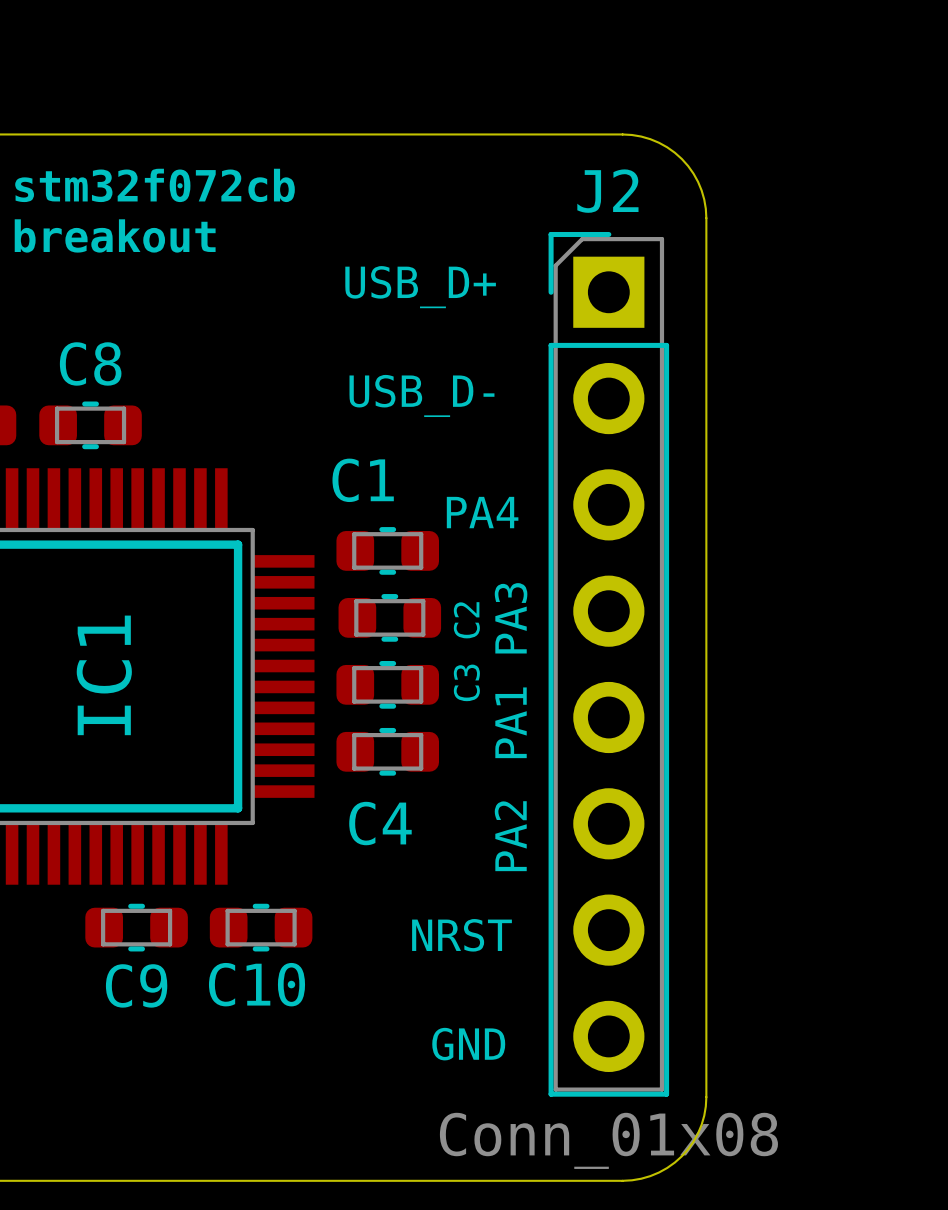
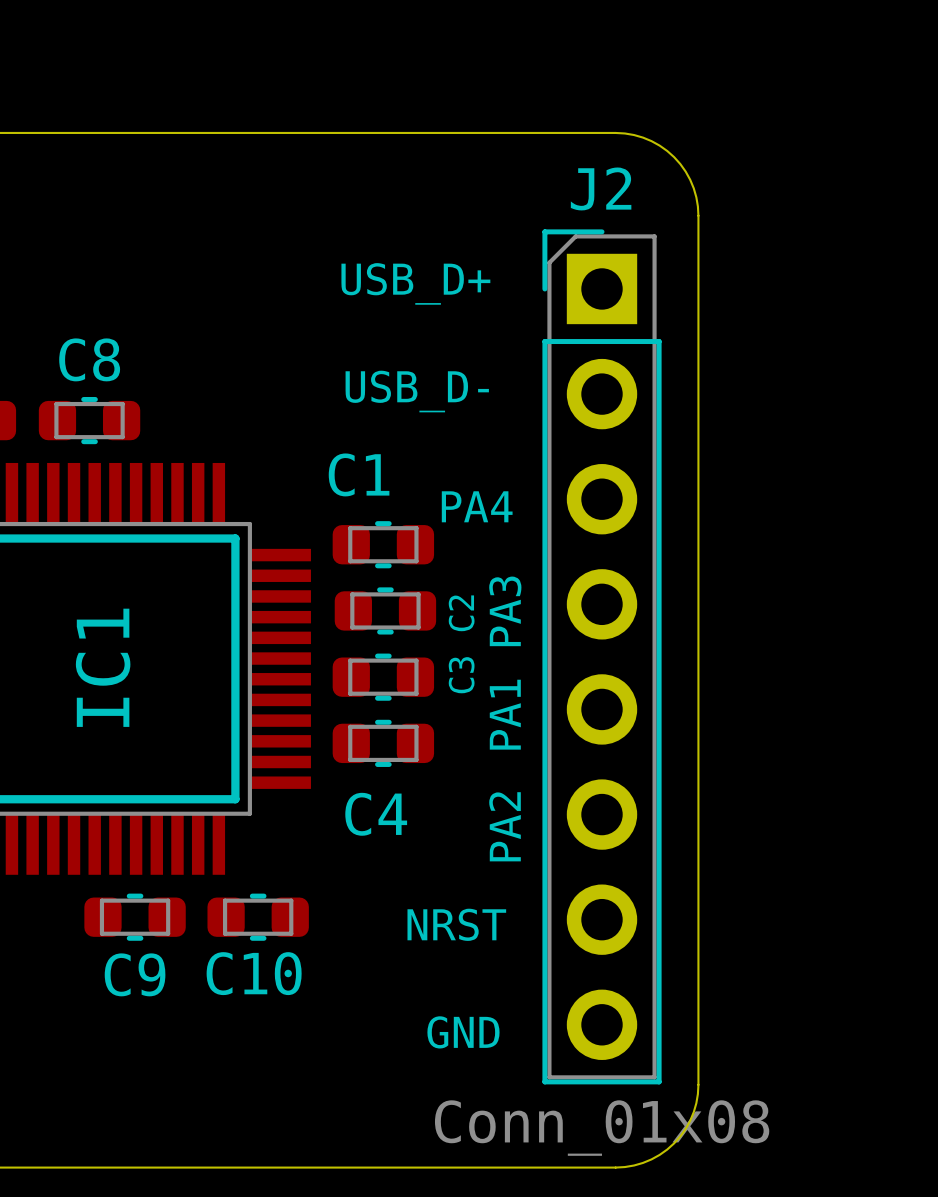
text: stm32f072cb (155, 185) -> none
text: breakout (115, 235) -> none

